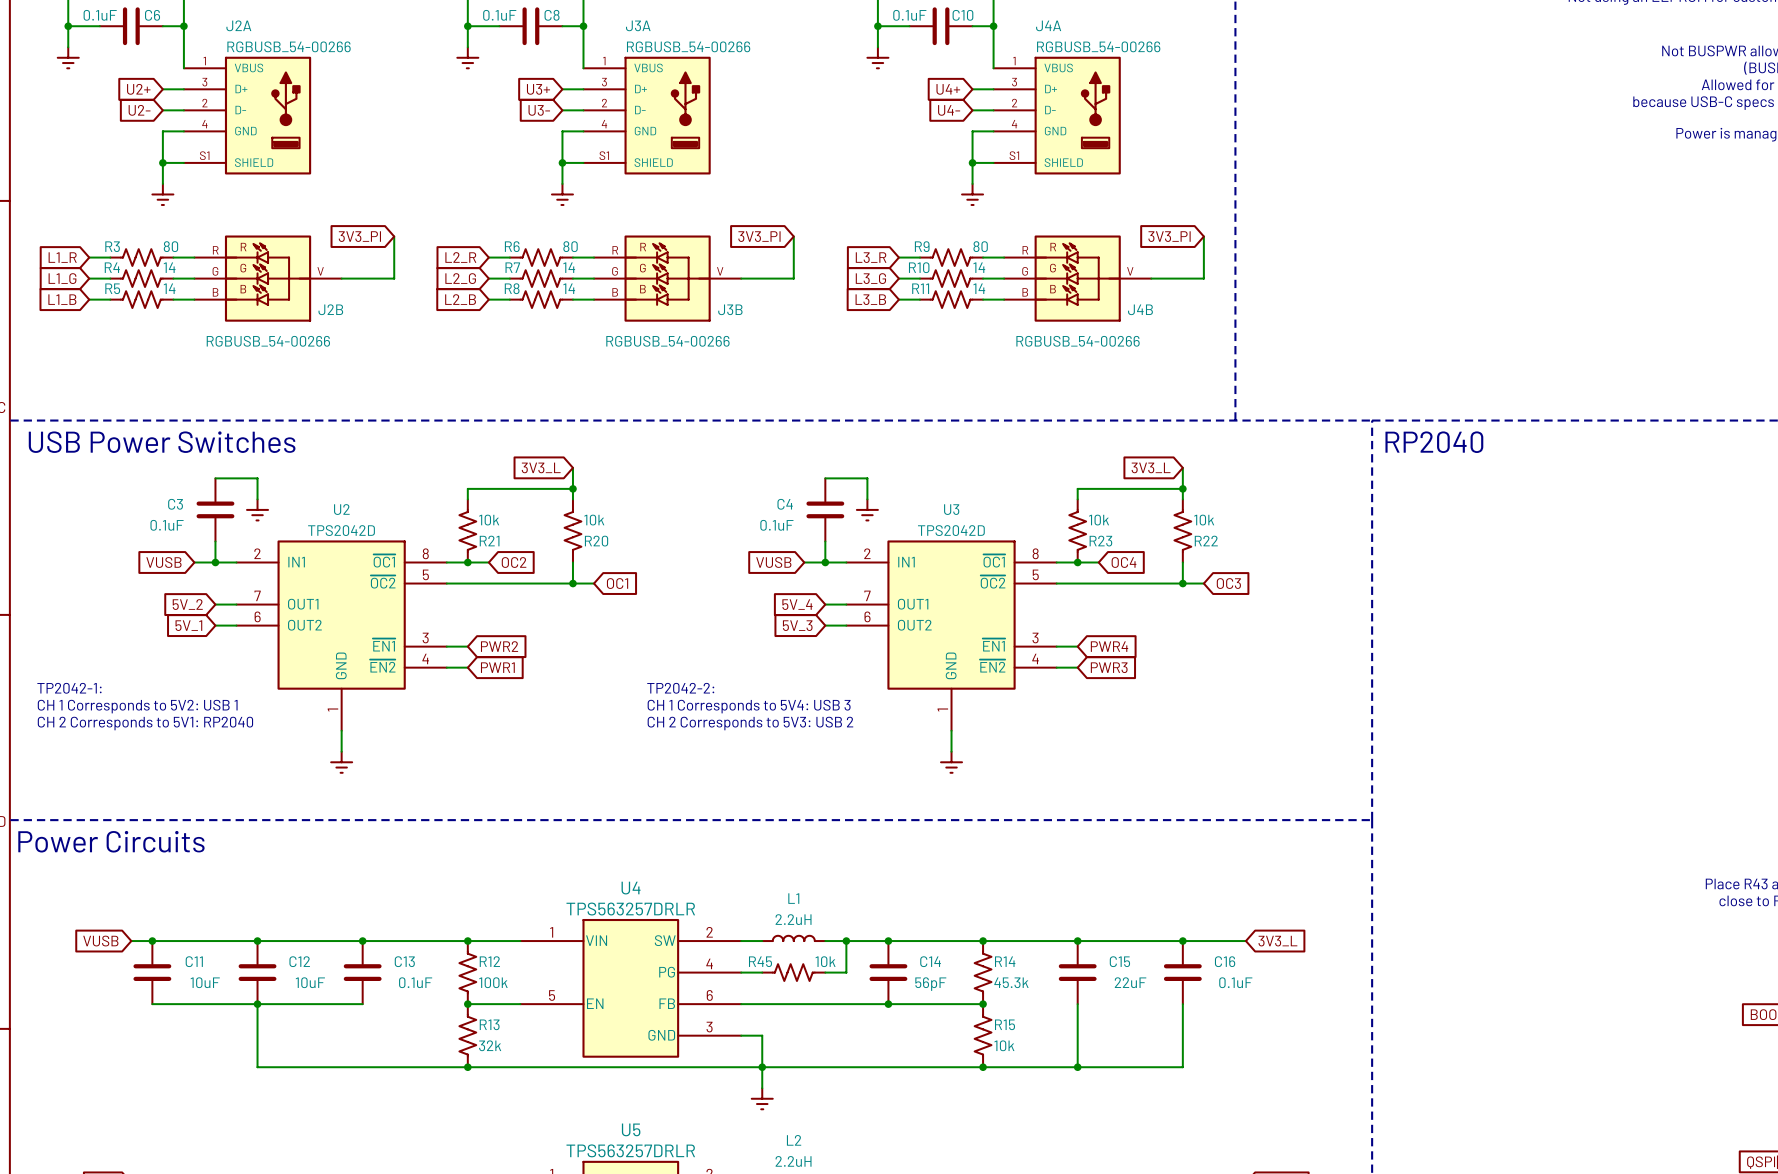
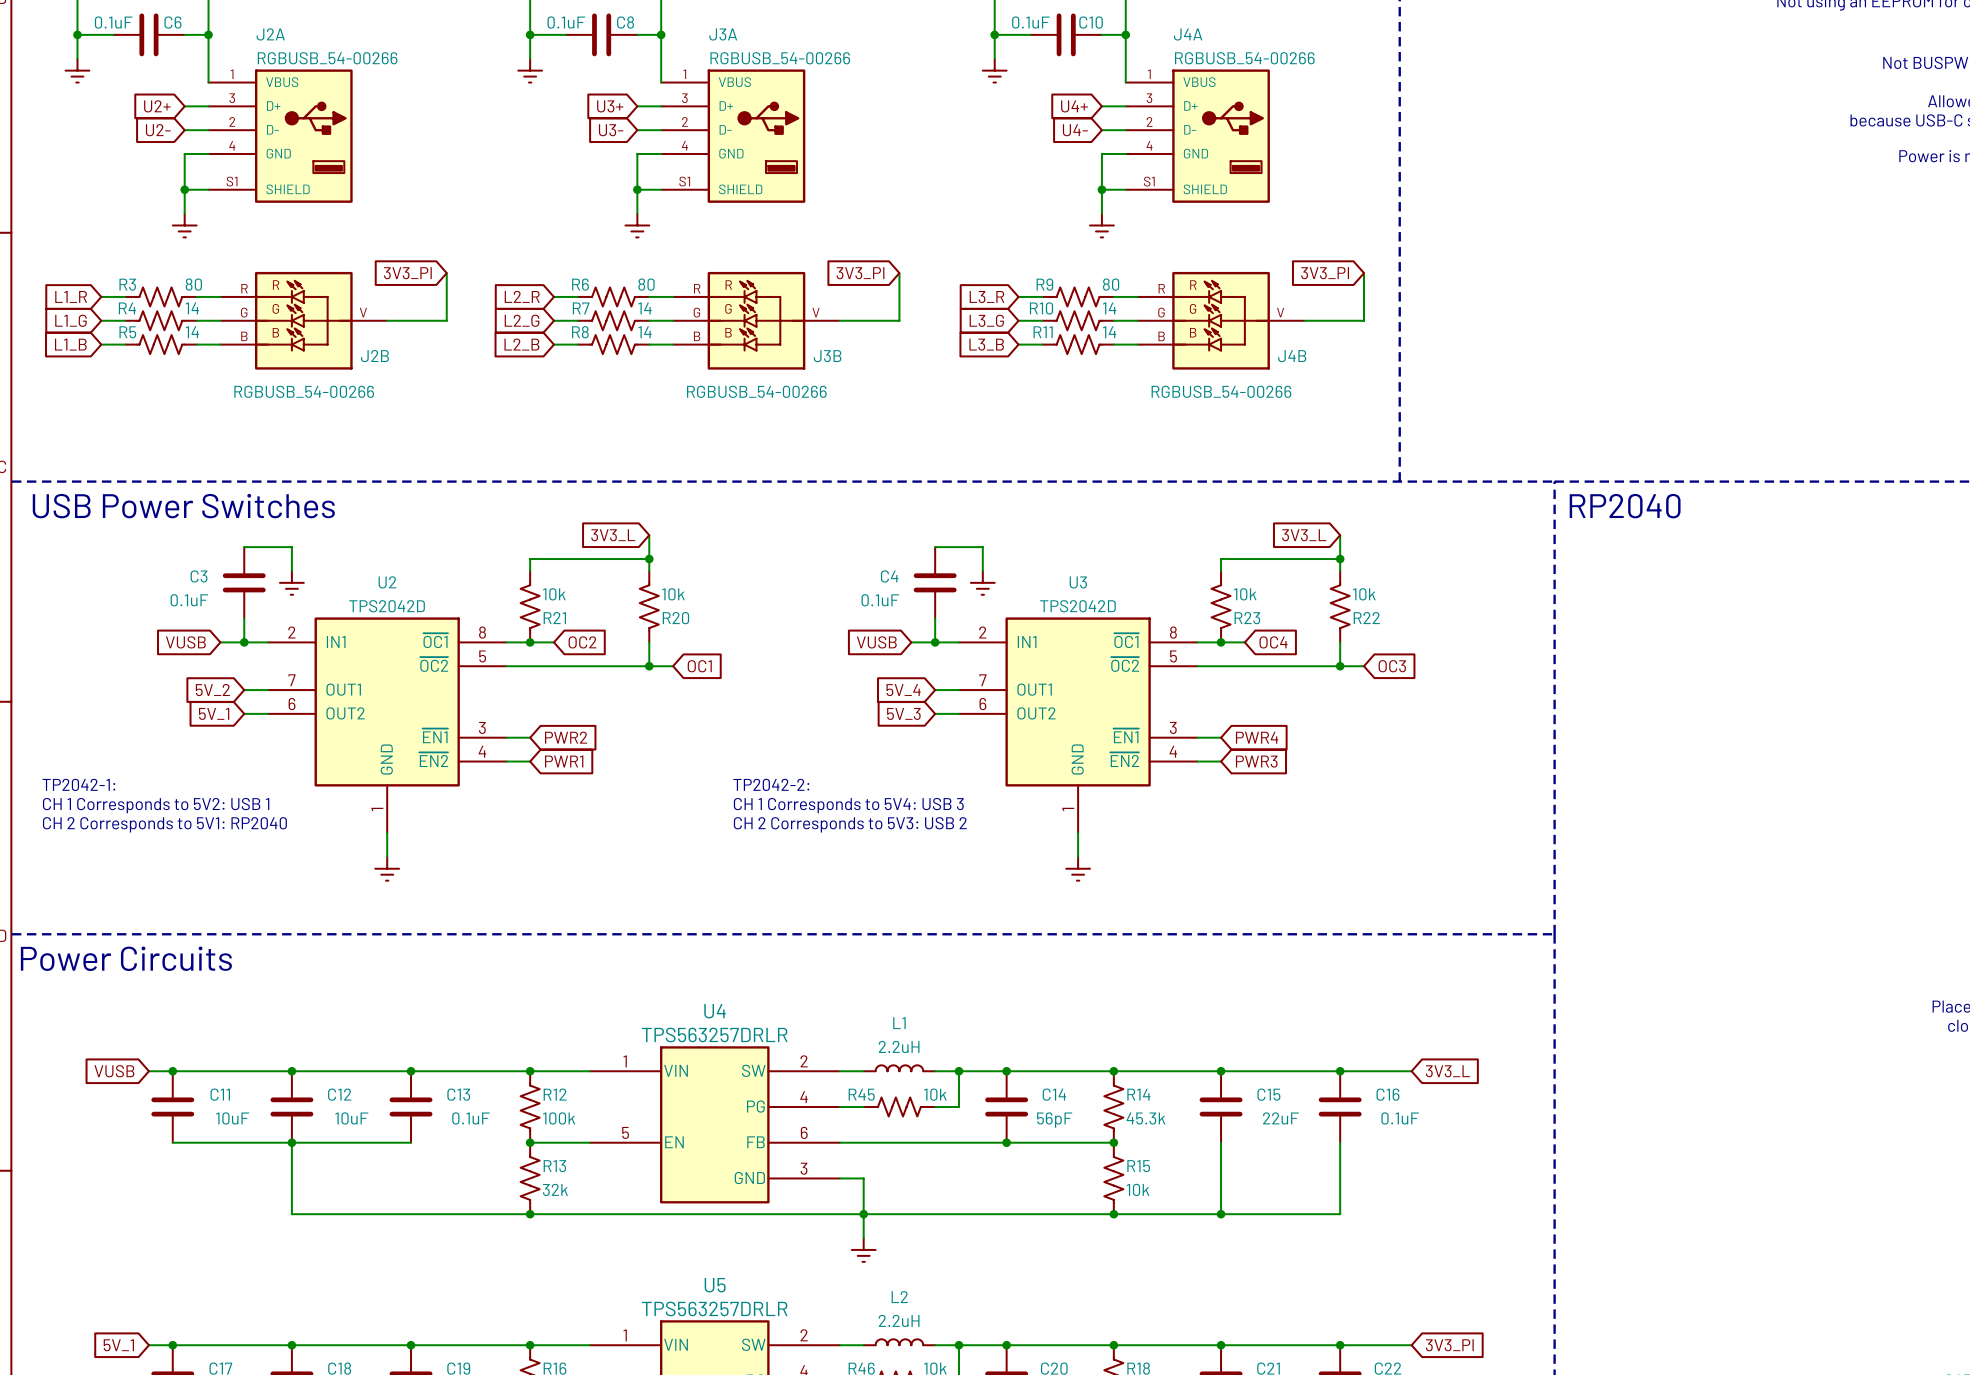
J2A symbol: [183, 56, 312, 175] -> [208, 69, 353, 203]
J3A symbol: [583, 56, 711, 175] -> [661, 69, 806, 203]
J4A symbol: [993, 56, 1121, 175] -> [1125, 69, 1270, 203]

